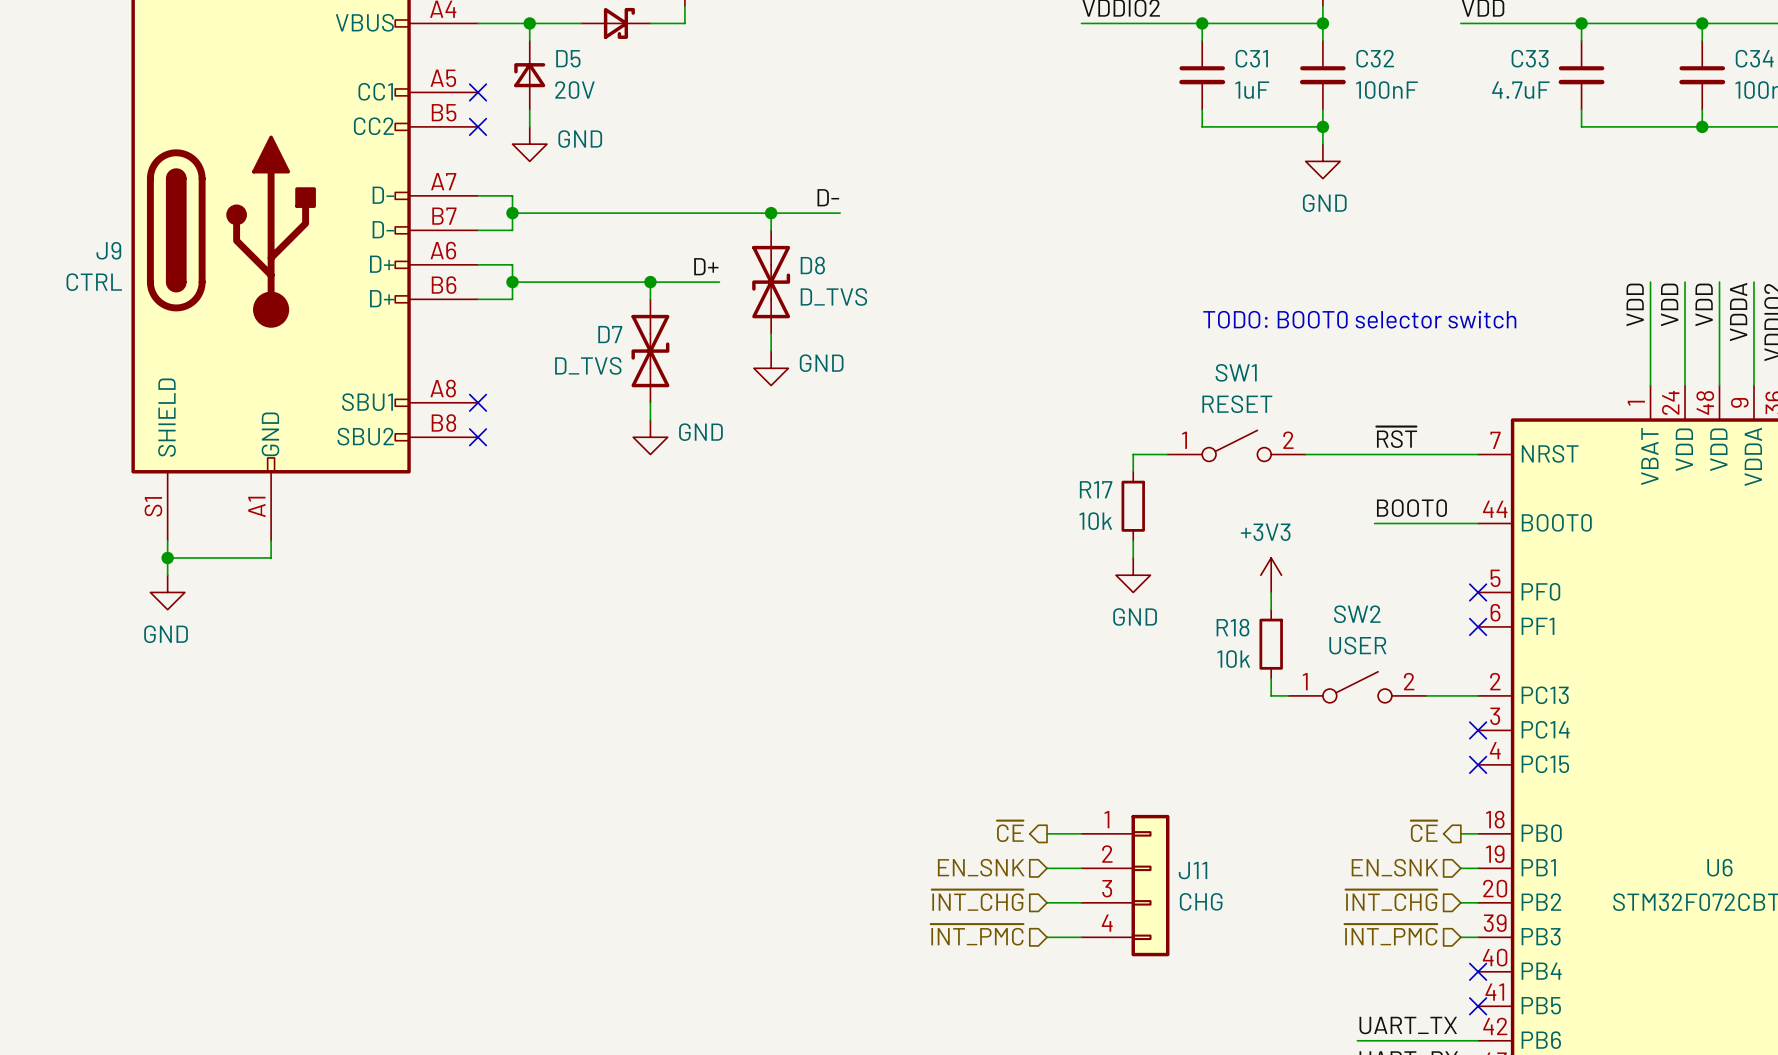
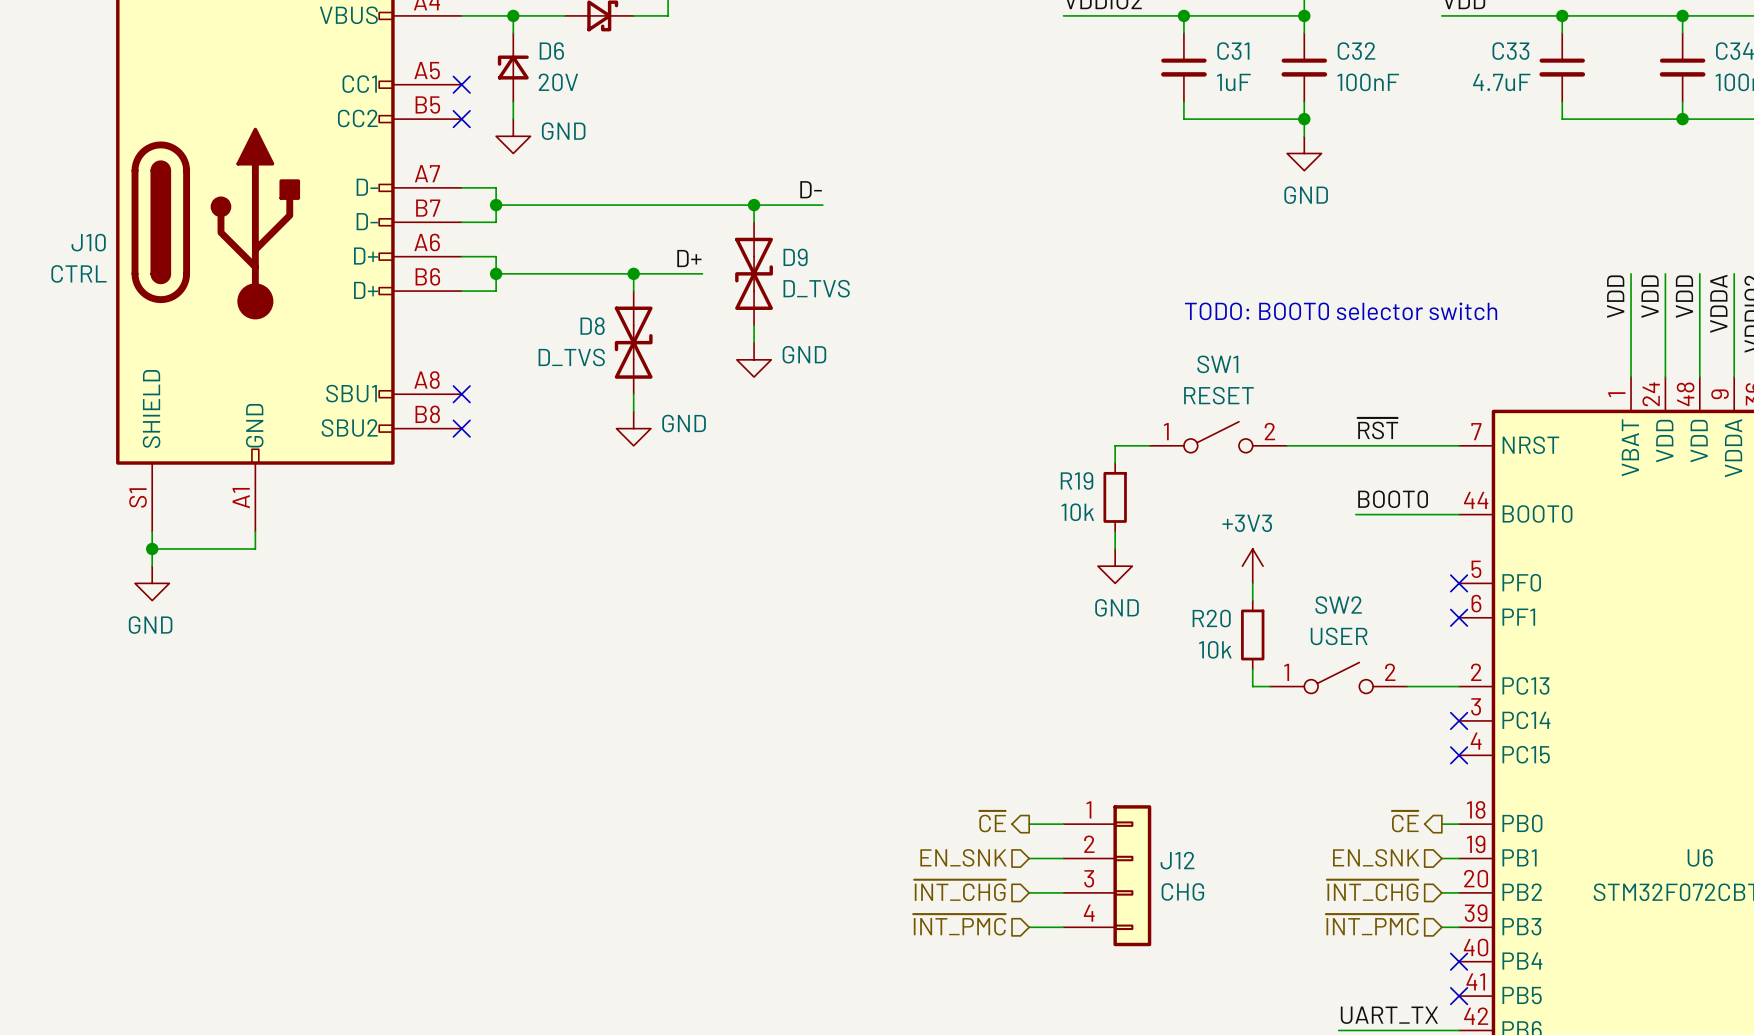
D5 name: D5 (568, 58) -> D6 (551, 51)
J9 name: J9 (108, 250) -> J10 (88, 242)
D8 name: D8 (812, 265) -> D9 (795, 257)
D7 name: D7 (610, 334) -> D8 (592, 326)
R17 name: R17 (1096, 489) -> R19 (1077, 480)
R18 name: R18 (1232, 627) -> R20 (1211, 618)
J11 name: J11 (1193, 870) -> J12 (1177, 860)

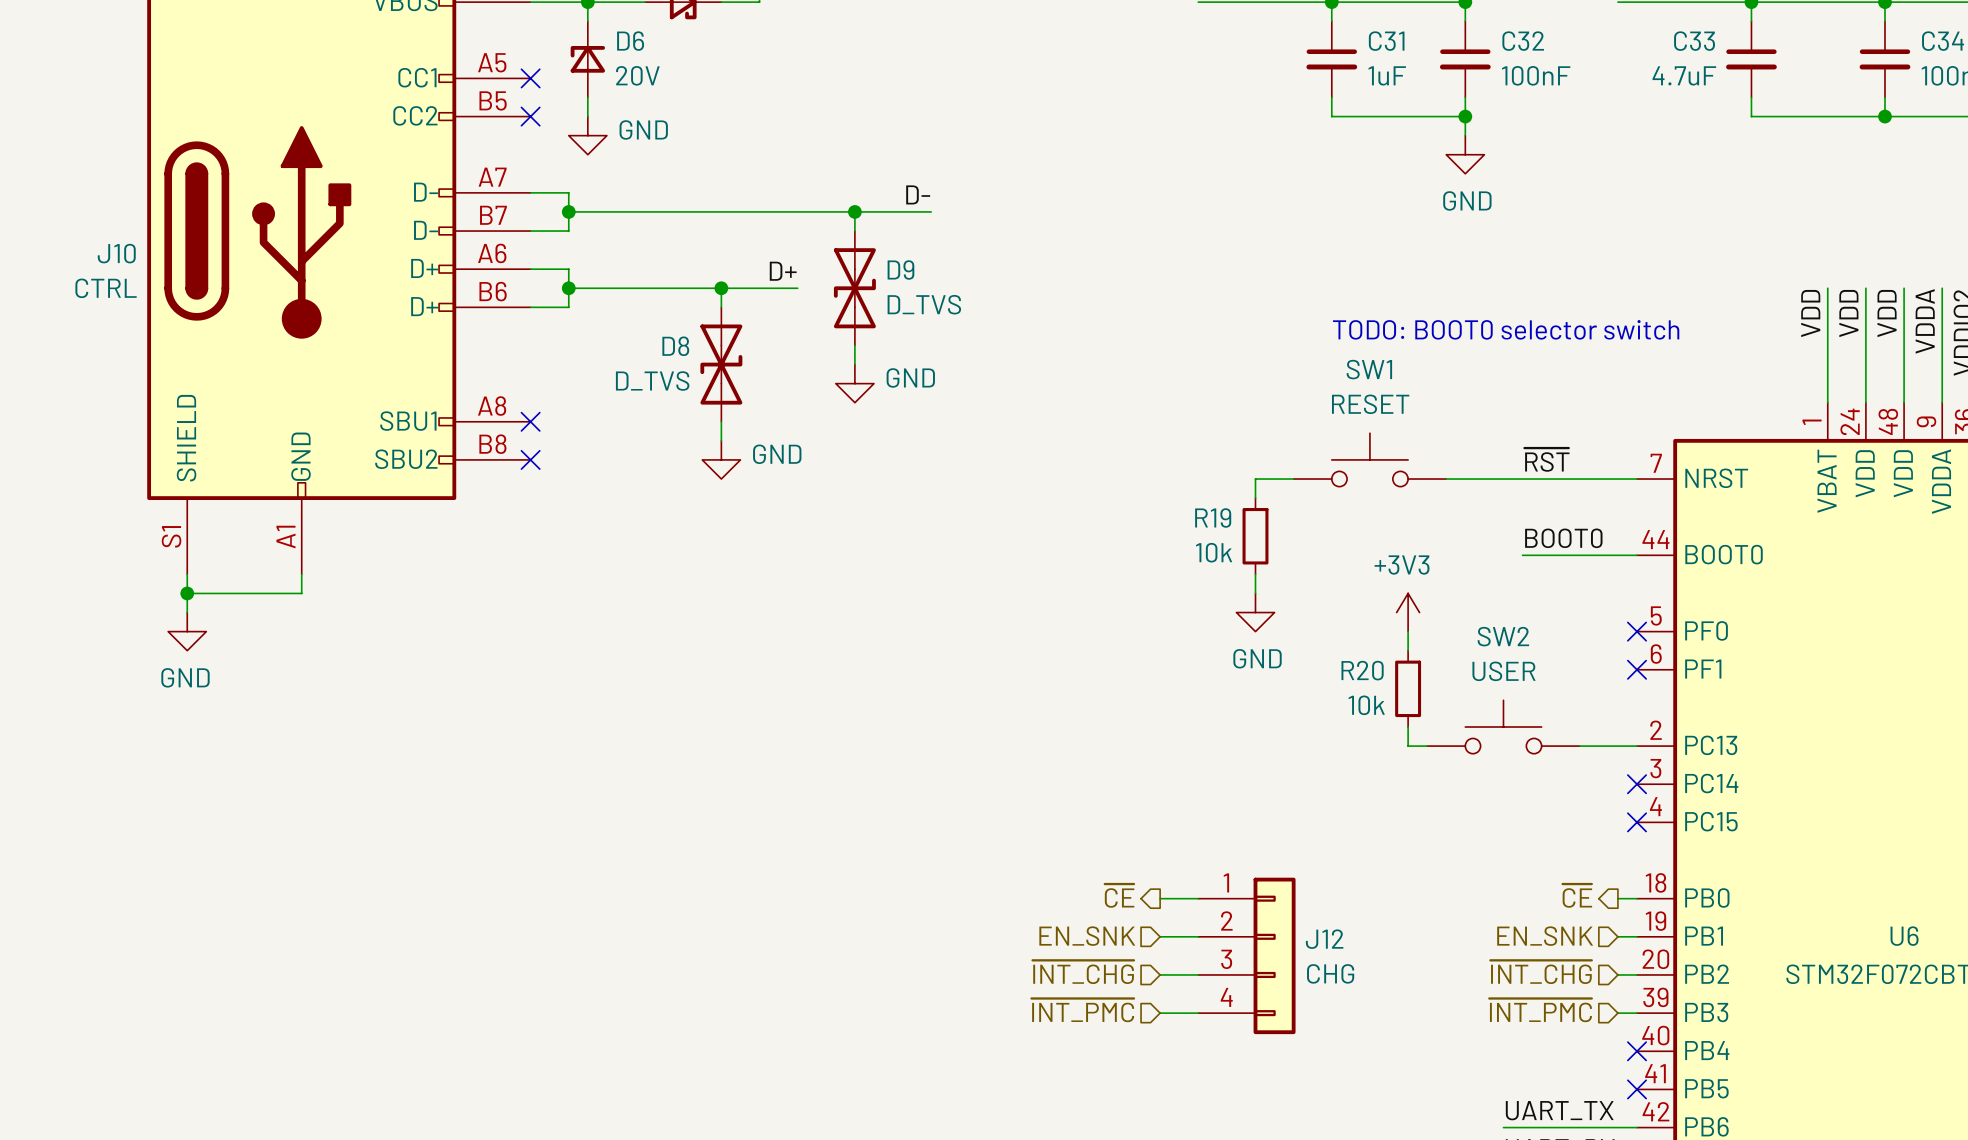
SW1 symbol: [1149, 421, 1288, 453] -> [1293, 433, 1447, 487]
SW2 symbol: [1269, 662, 1408, 694] -> [1427, 700, 1580, 754]

